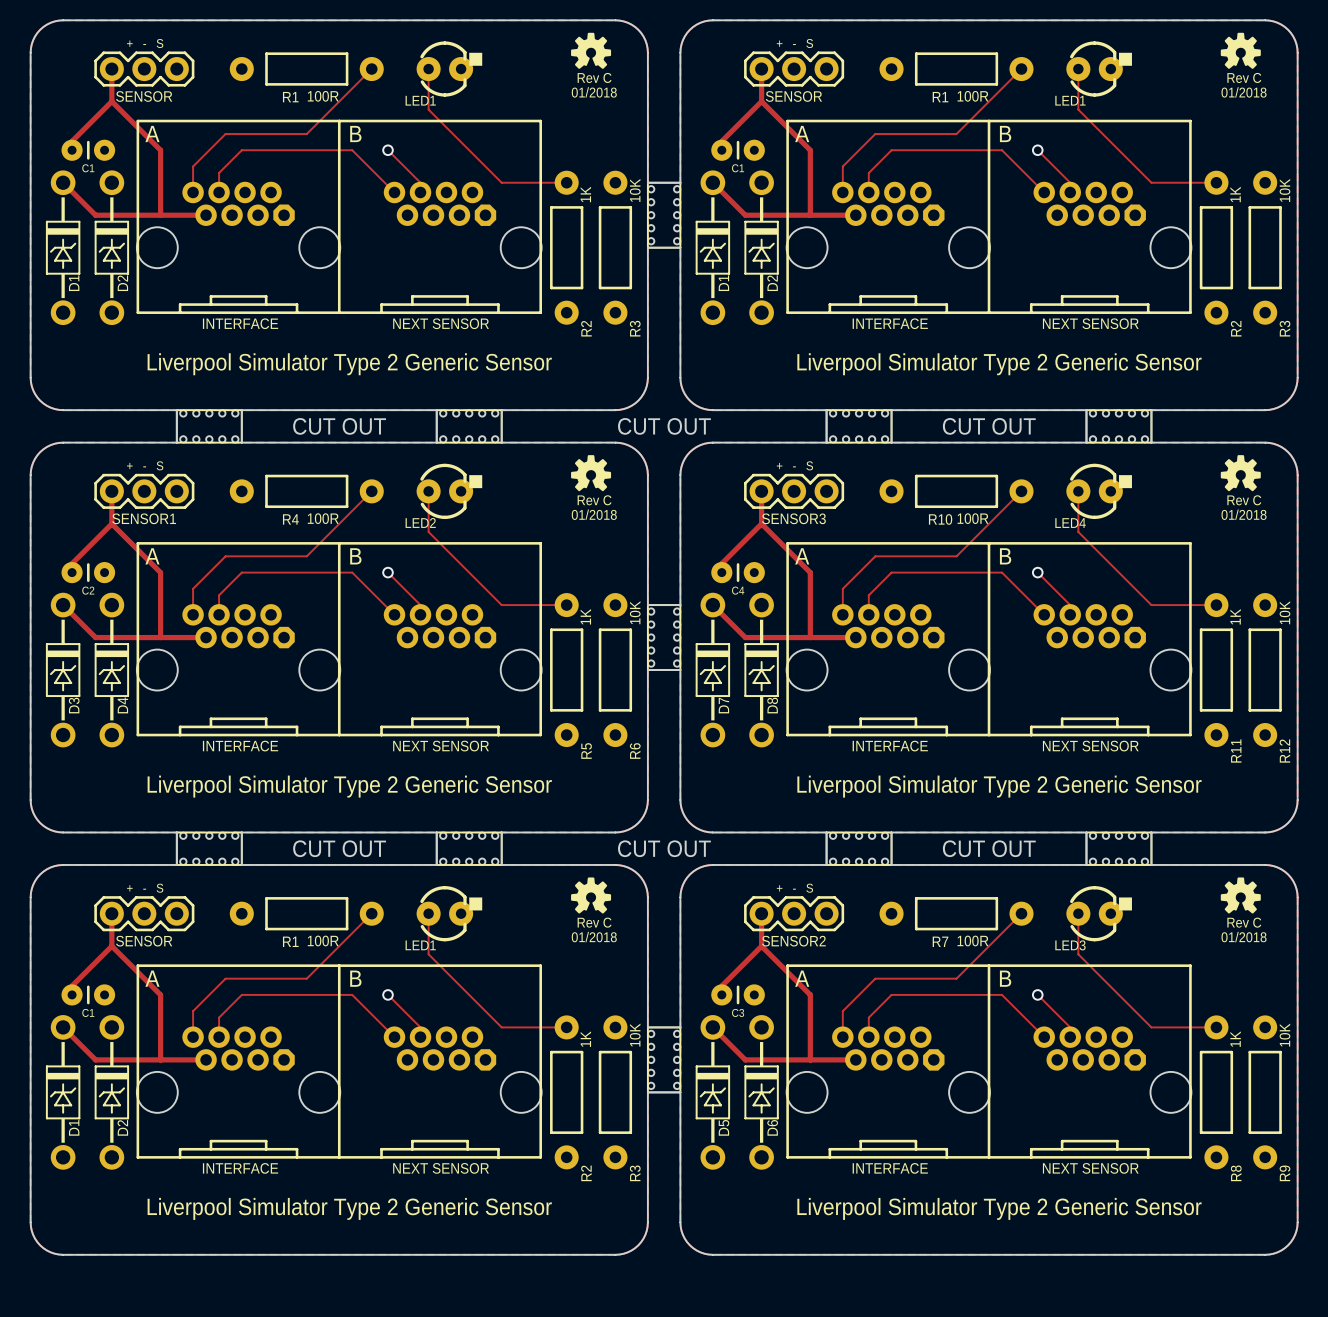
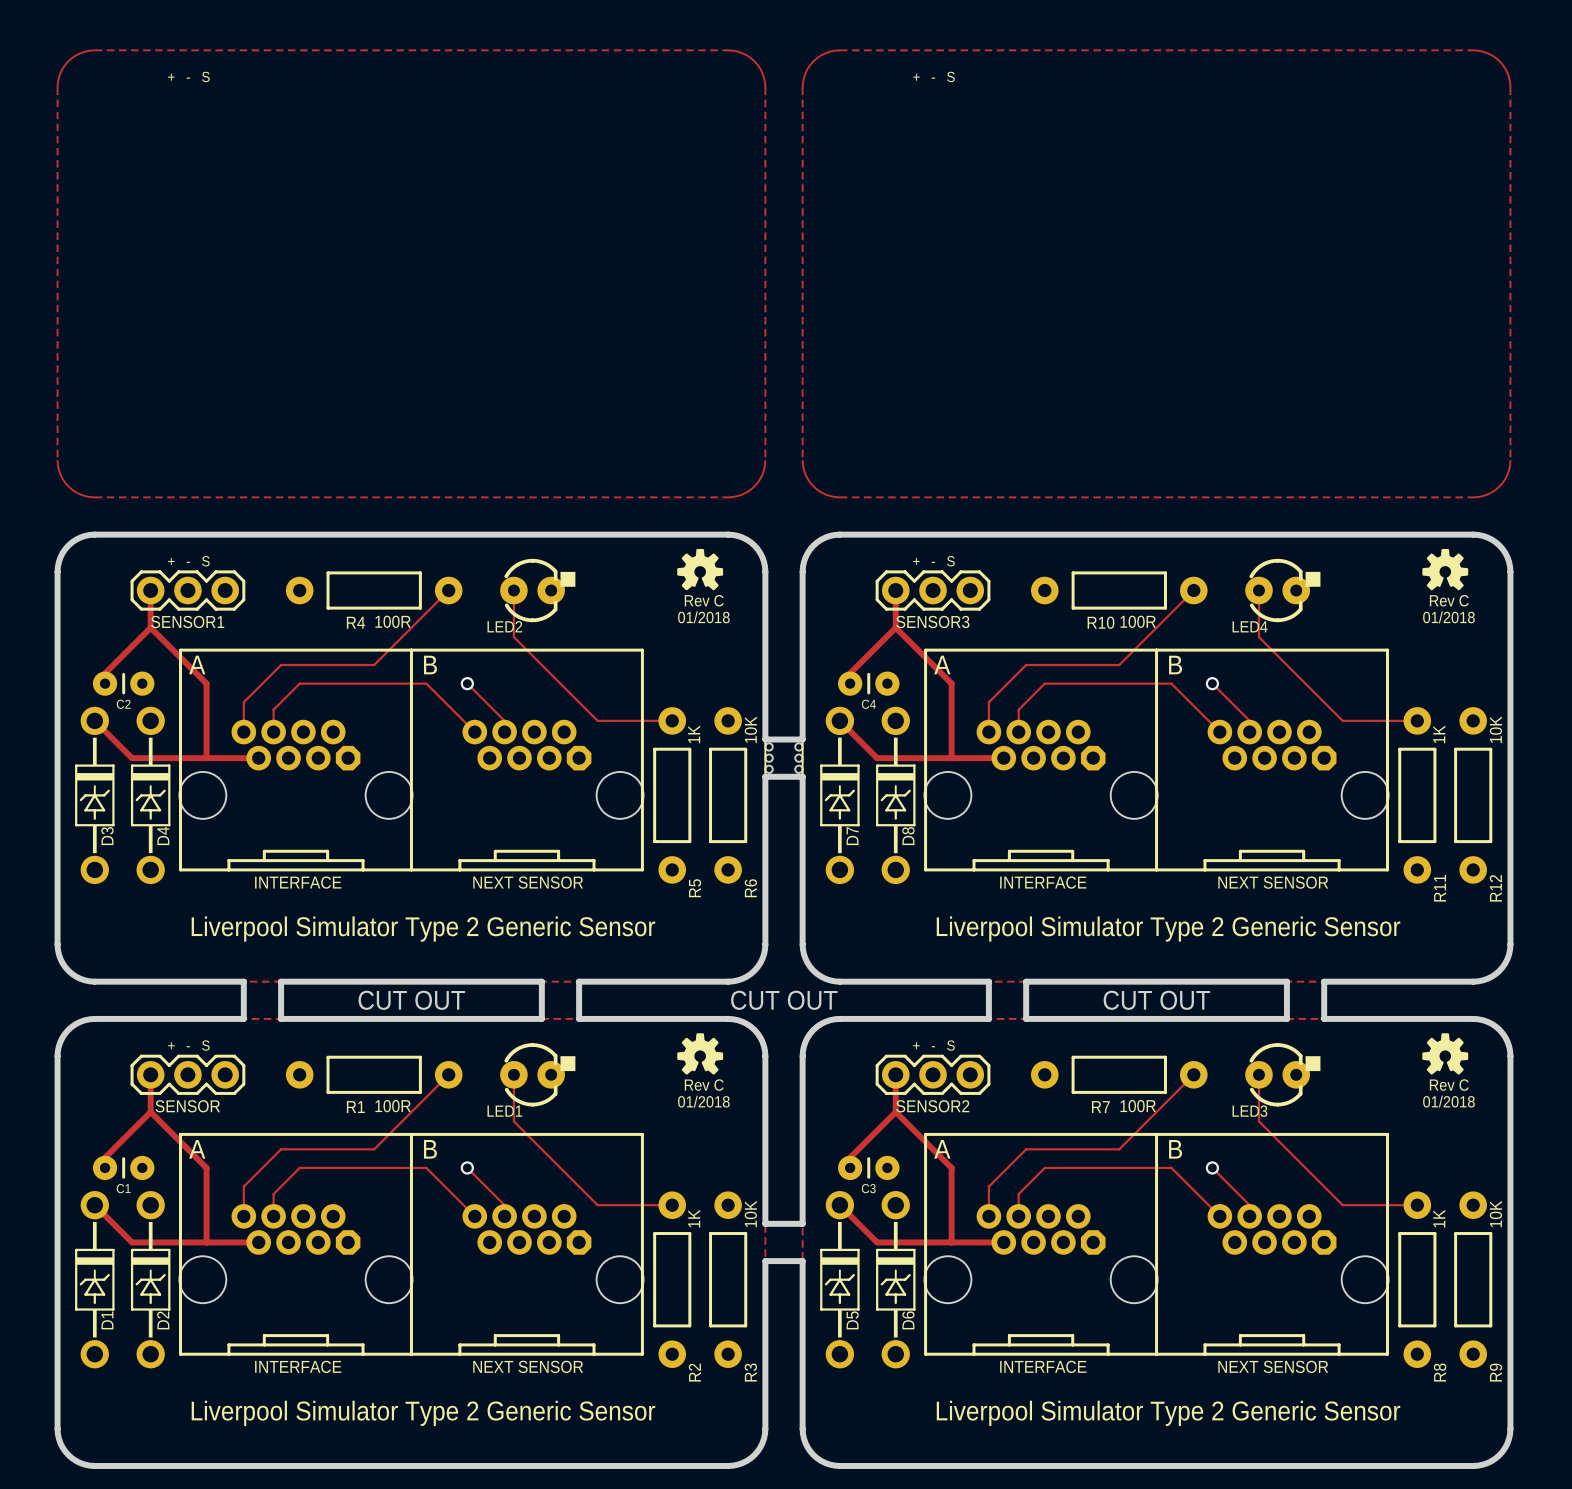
part footprint: [29, 19, 1299, 1256] -> [765, 739, 803, 778]
drawing: [571, 32, 612, 69] -> none
drawing: [1220, 32, 1261, 69] -> none
drawing: [469, 52, 483, 66] -> none
drawing: [1118, 52, 1132, 66] -> none
track: (111, 69) (111, 101) -> none
part: (144, 69) -> none
part: 100R (306, 69) -> none
track: (371, 69) (306, 134) (225, 134) (193, 166) (193, 192) -> none
track: (428, 69) (428, 109) (501, 182) (566, 182) -> none
part: (444, 69) -> none
track: (761, 69) (761, 101) -> none
part: (794, 69) -> none
part: 100R (956, 69) -> none
track: (1021, 69) (956, 134) (875, 134) (842, 166) (842, 192) -> none
track: (1078, 69) (1078, 109) (1151, 182) (1216, 182) -> none
part: (1094, 69) -> none
text: Rev C (594, 77) -> none
text: Rev C (1244, 77) -> none
text: 01/2018 (594, 92) -> none
text: 01/2018 (1244, 92) -> none
track: (111, 101) (160, 150) (160, 215) -> none
track: (111, 101) (72, 141) (72, 150) -> none
track: (761, 101) (810, 150) (810, 215) -> none
track: (761, 101) (721, 141) (721, 150) -> none
part: (88, 150) -> none
track: (388, 150) (420, 182) (420, 192) -> none
via: (388, 150) -> none
part: (738, 150) -> none
track: (1037, 150) (1070, 182) (1070, 192) -> none
via: (1037, 150) -> none
track: (63, 182) (95, 215) (206, 215) -> none
track: (712, 182) (745, 215) (855, 215) -> none
track: (219, 192) (219, 172) (241, 150) (352, 150) (394, 192) -> none
track: (868, 192) (868, 172) (891, 150) (1002, 150) (1044, 192) -> none
part: (339, 216) -> none
part: (989, 216) -> none
part: (63, 247) -> none
part: (111, 247) -> none
part: 1K (566, 247) -> none
part: 10K (615, 247) -> none
part: (712, 247) -> none
part: (761, 247) -> none
part: 1K (1216, 247) -> none
part: 10K (1265, 247) -> none
text: INTERFACE (240, 323) -> none
text: NEXT SENSOR (441, 323) -> none
text: INTERFACE (890, 323) -> none
text: NEXT SENSOR (1090, 323) -> none
text: Liverpool Simulator Type 2 Generic Sensor (349, 364) -> none
text: Liverpool Simulator Type 2 Generic Sensor (999, 364) -> none
board edge: none -> (94, 534) (737, 535) (754, 545) (762, 557) (765, 567) (765, 739) (802, 739) (802, 567) (805, 557) (813, 545) (830, 535) (1473, 534) (1491, 539) (1505, 553) (1510, 571) (1510, 944) (1507, 958) (1495, 973) (1478, 981) (1324, 981) (1324, 1018) (1478, 1019) (1495, 1026) (1507, 1041) (1510, 1056) (1510, 1428) (1505, 1447) (1491, 1460) (1473, 1465) (830, 1464) (813, 1455) (805, 1442) (802, 1433) (802, 1261) (765, 1261) (765, 1433) (762, 1442) (754, 1455) (737, 1464) (94, 1465) (76, 1460) (62, 1447) (57, 1428) (57, 1056) (60, 1041) (72, 1026) (89, 1019) (243, 1018) (243, 981) (89, 981) (80, 978) (68, 970) (58, 954) (57, 567) (60, 557) (68, 545) (80, 537) (94, 534)
board edge: none -> (765, 776) (765, 944) (764, 954) (757, 967) (746, 976) (732, 981) (579, 981) (579, 1018) (728, 1018) (742, 1021) (754, 1029) (762, 1041) (765, 1056) (765, 1223) (802, 1223) (802, 1056) (803, 1046) (810, 1033) (821, 1023) (835, 1019) (988, 1018) (988, 981) (839, 981) (825, 978) (813, 970) (805, 958) (802, 944) (802, 776) (765, 776)
board edge: none -> (281, 981) (541, 981) (541, 1018) (281, 1018) (281, 981)
board edge: none -> (1026, 981) (1286, 981) (1286, 1018) (1026, 1018) (1026, 981)

